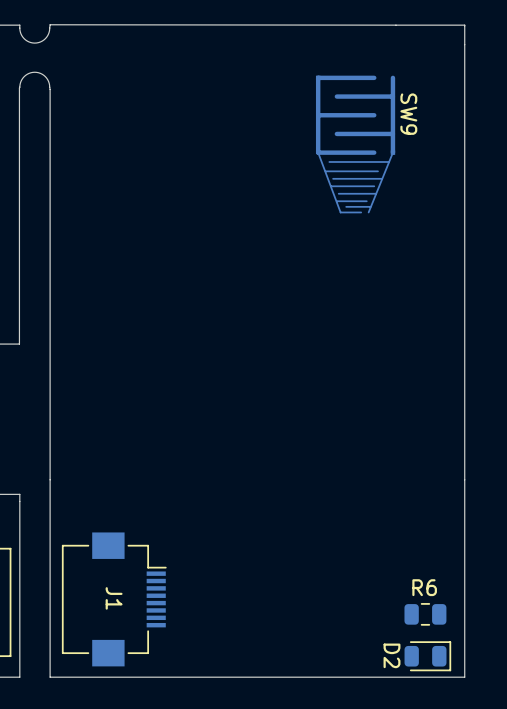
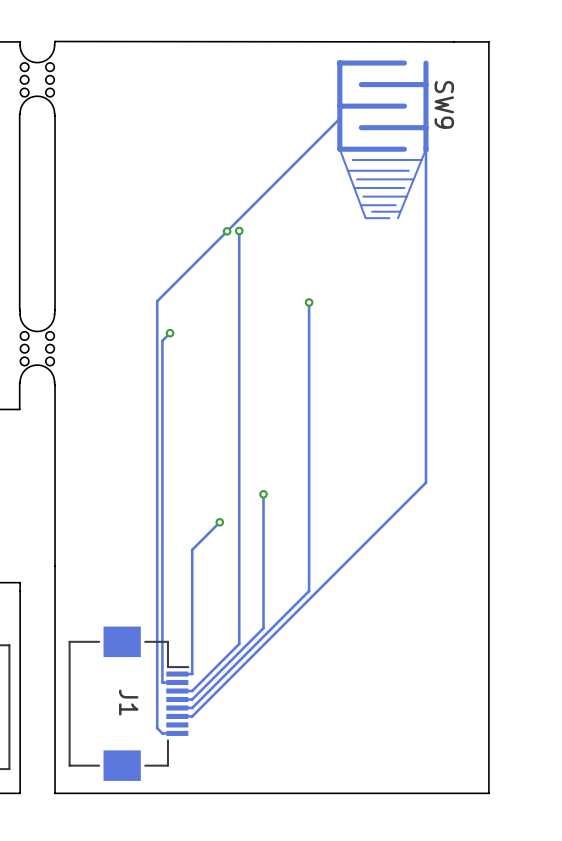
board edge: (426, 25) (464, 25) (464, 677) (426, 677) -> (488, 41) (488, 793)
track: none -> (339, 63) (339, 118) (157, 301) (157, 728) (162, 733) (177, 733)
part: none -> (37, 79)
track: none -> (425, 149) (425, 482) (192, 716) (177, 716)
SW9 position: (355, 144) -> (382, 139)
via: none -> (227, 231)
track: none -> (239, 230) (239, 643) (192, 691) (177, 691)
via: none -> (239, 230)
track: none -> (309, 302) (309, 591) (192, 707) (177, 707)
via: none -> (309, 302)
board edge: (19, 256) (19, 321) -> (19, 309) (23, 324) (28, 329) (37, 331) (45, 329) (51, 324) (55, 310)
board edge: (50, 258) (50, 322) -> (19, 383) (25, 370) (37, 365) (49, 370) (53, 375) (55, 384)
track: none -> (170, 333) (162, 340) (162, 682) (177, 682)
via: none -> (170, 333)
part: none -> (37, 348)
track: none -> (263, 494) (263, 628) (192, 699) (177, 699)
via: none -> (263, 494)
track: none -> (219, 522) (192, 549) (192, 674) (177, 674)
via: none -> (219, 522)
R6: (425, 614) -> none
D2: (427, 656) -> none

